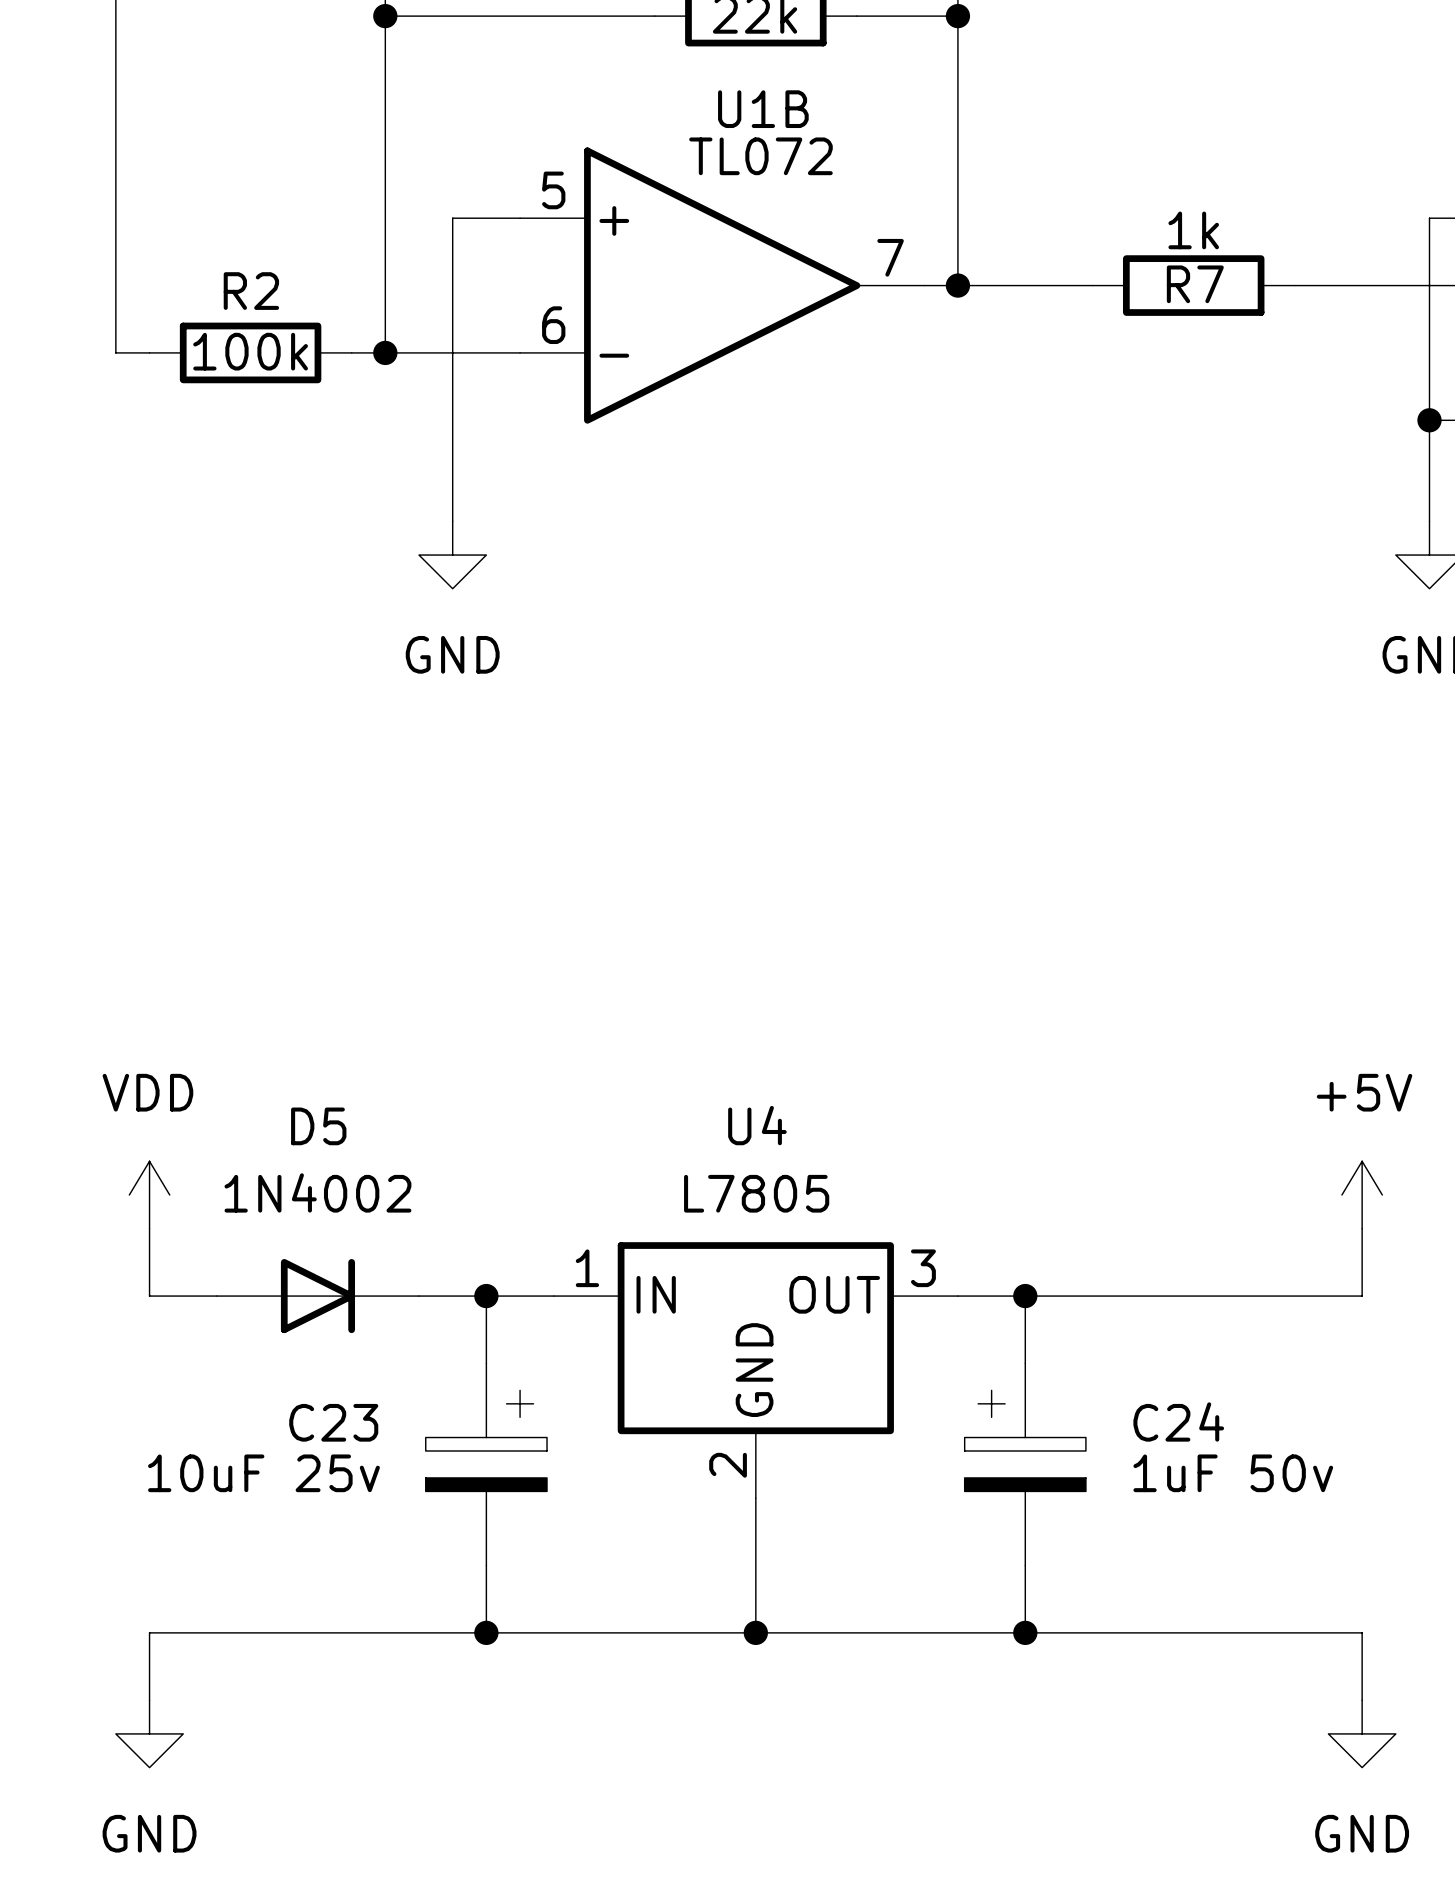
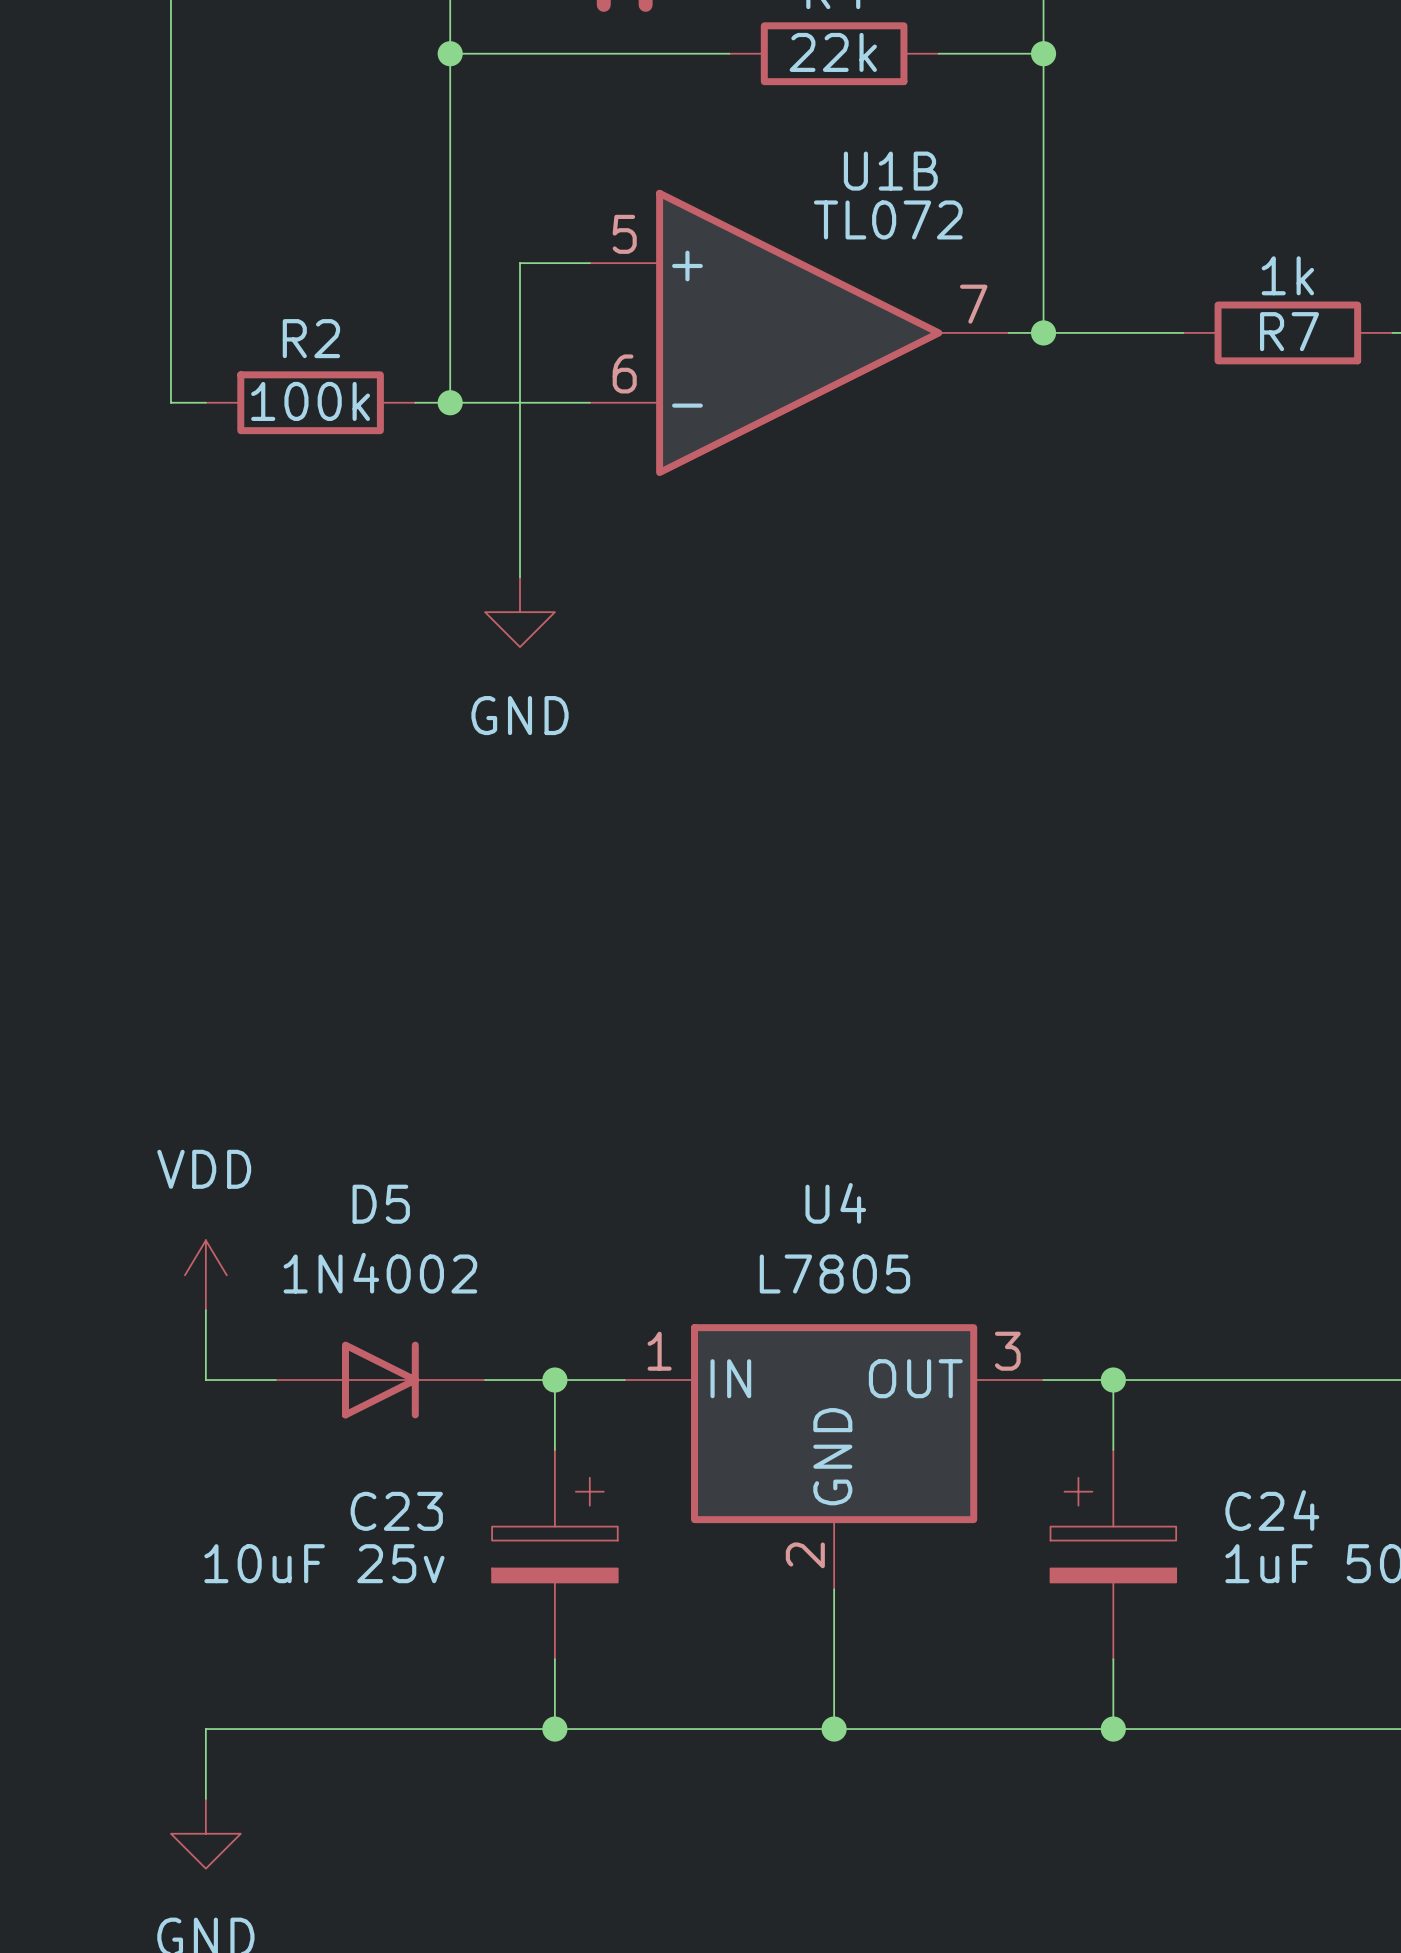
U1B name position: U1B (763, 109) -> U1B (890, 171)
U1B value position: TL072 (760, 156) -> TL072 (888, 219)

